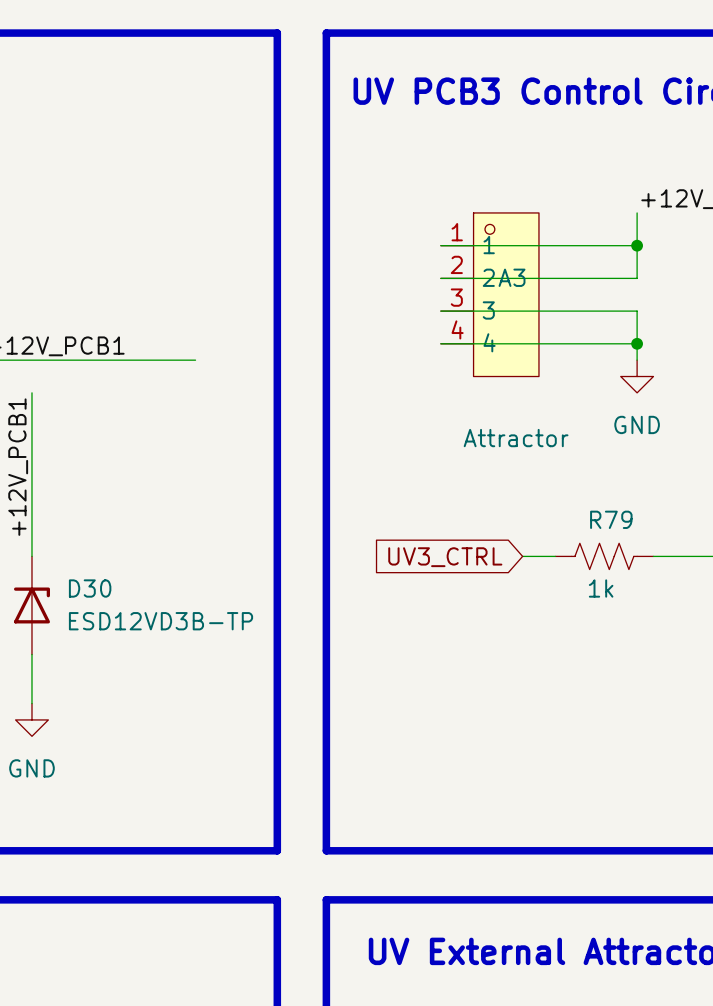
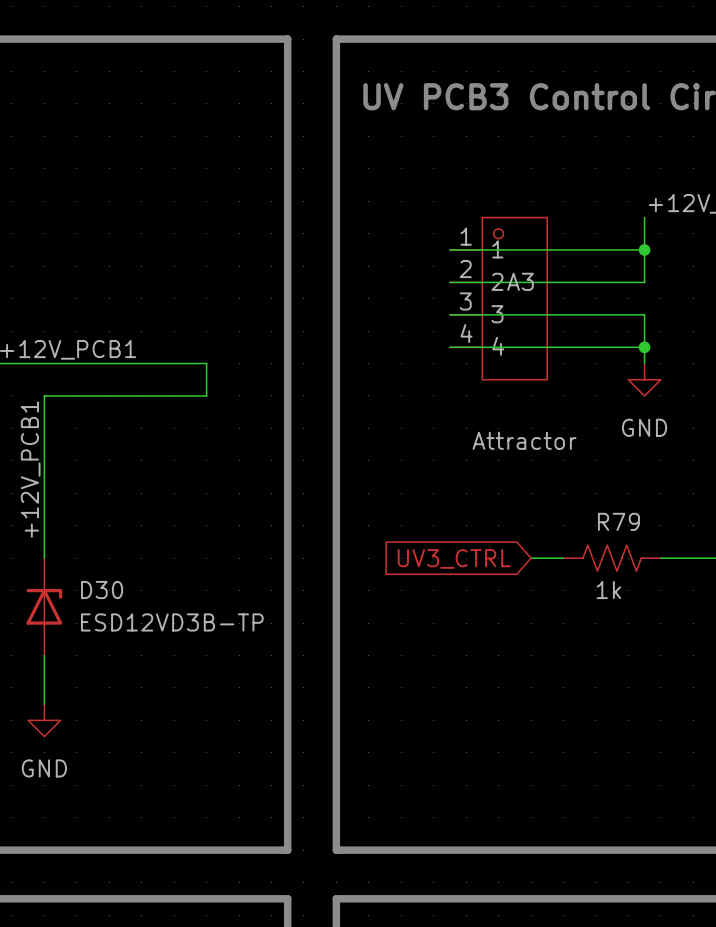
wire: none -> (206, 363) (206, 395) (44, 395)

